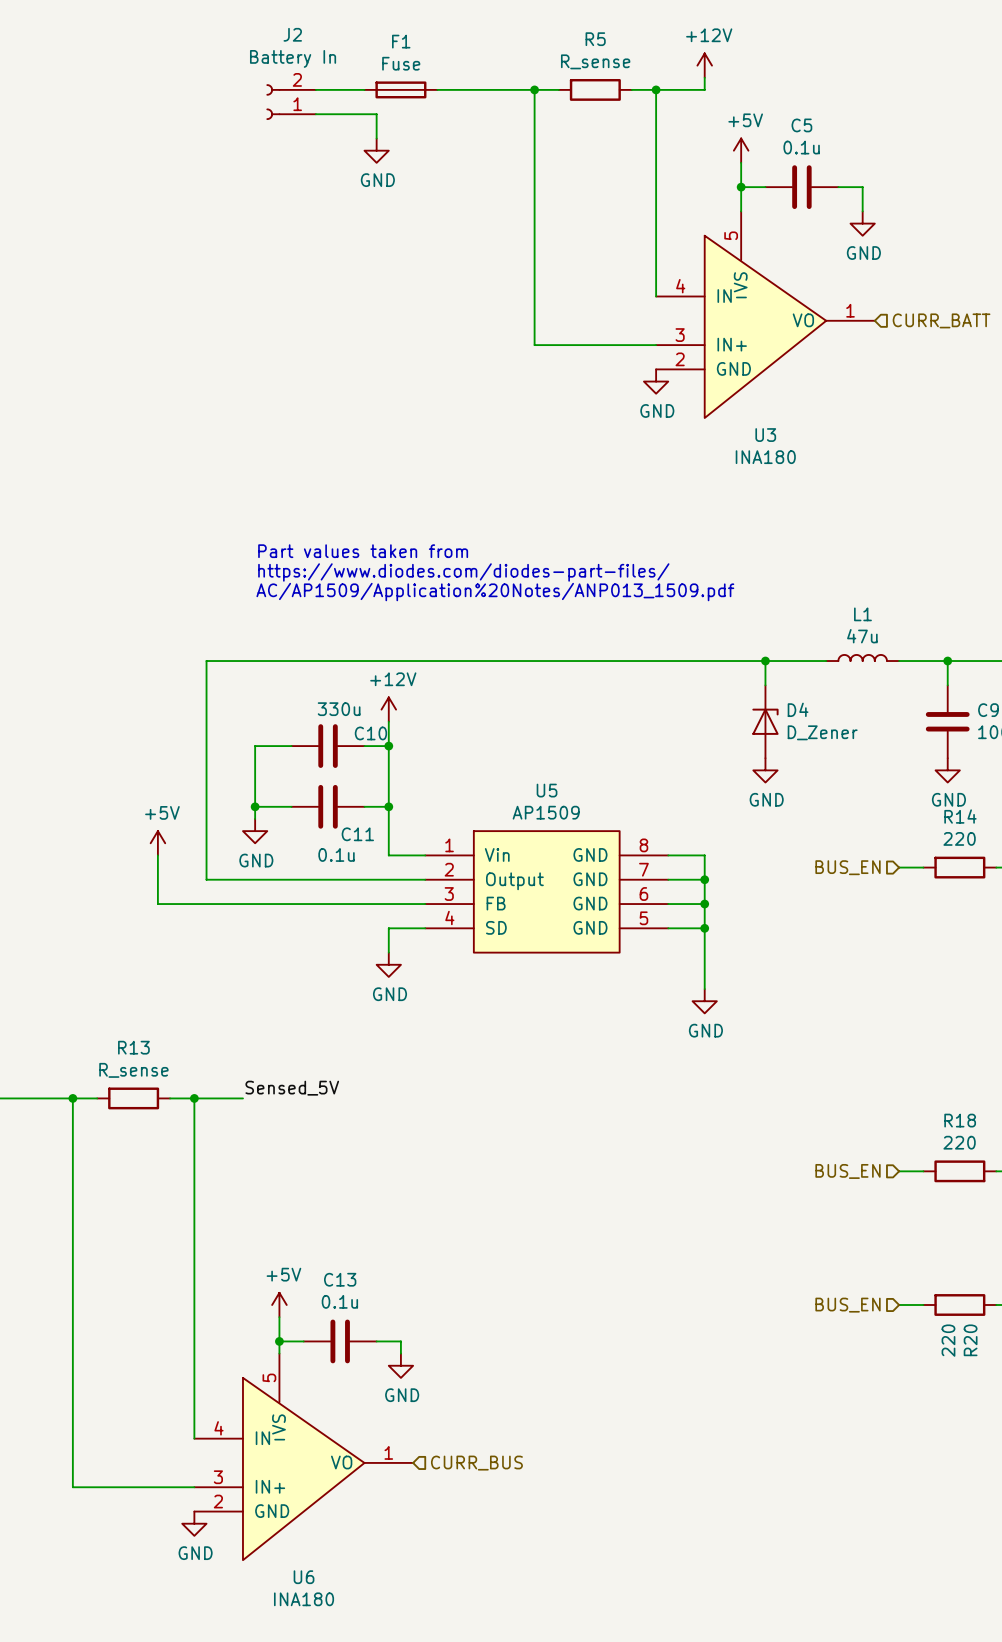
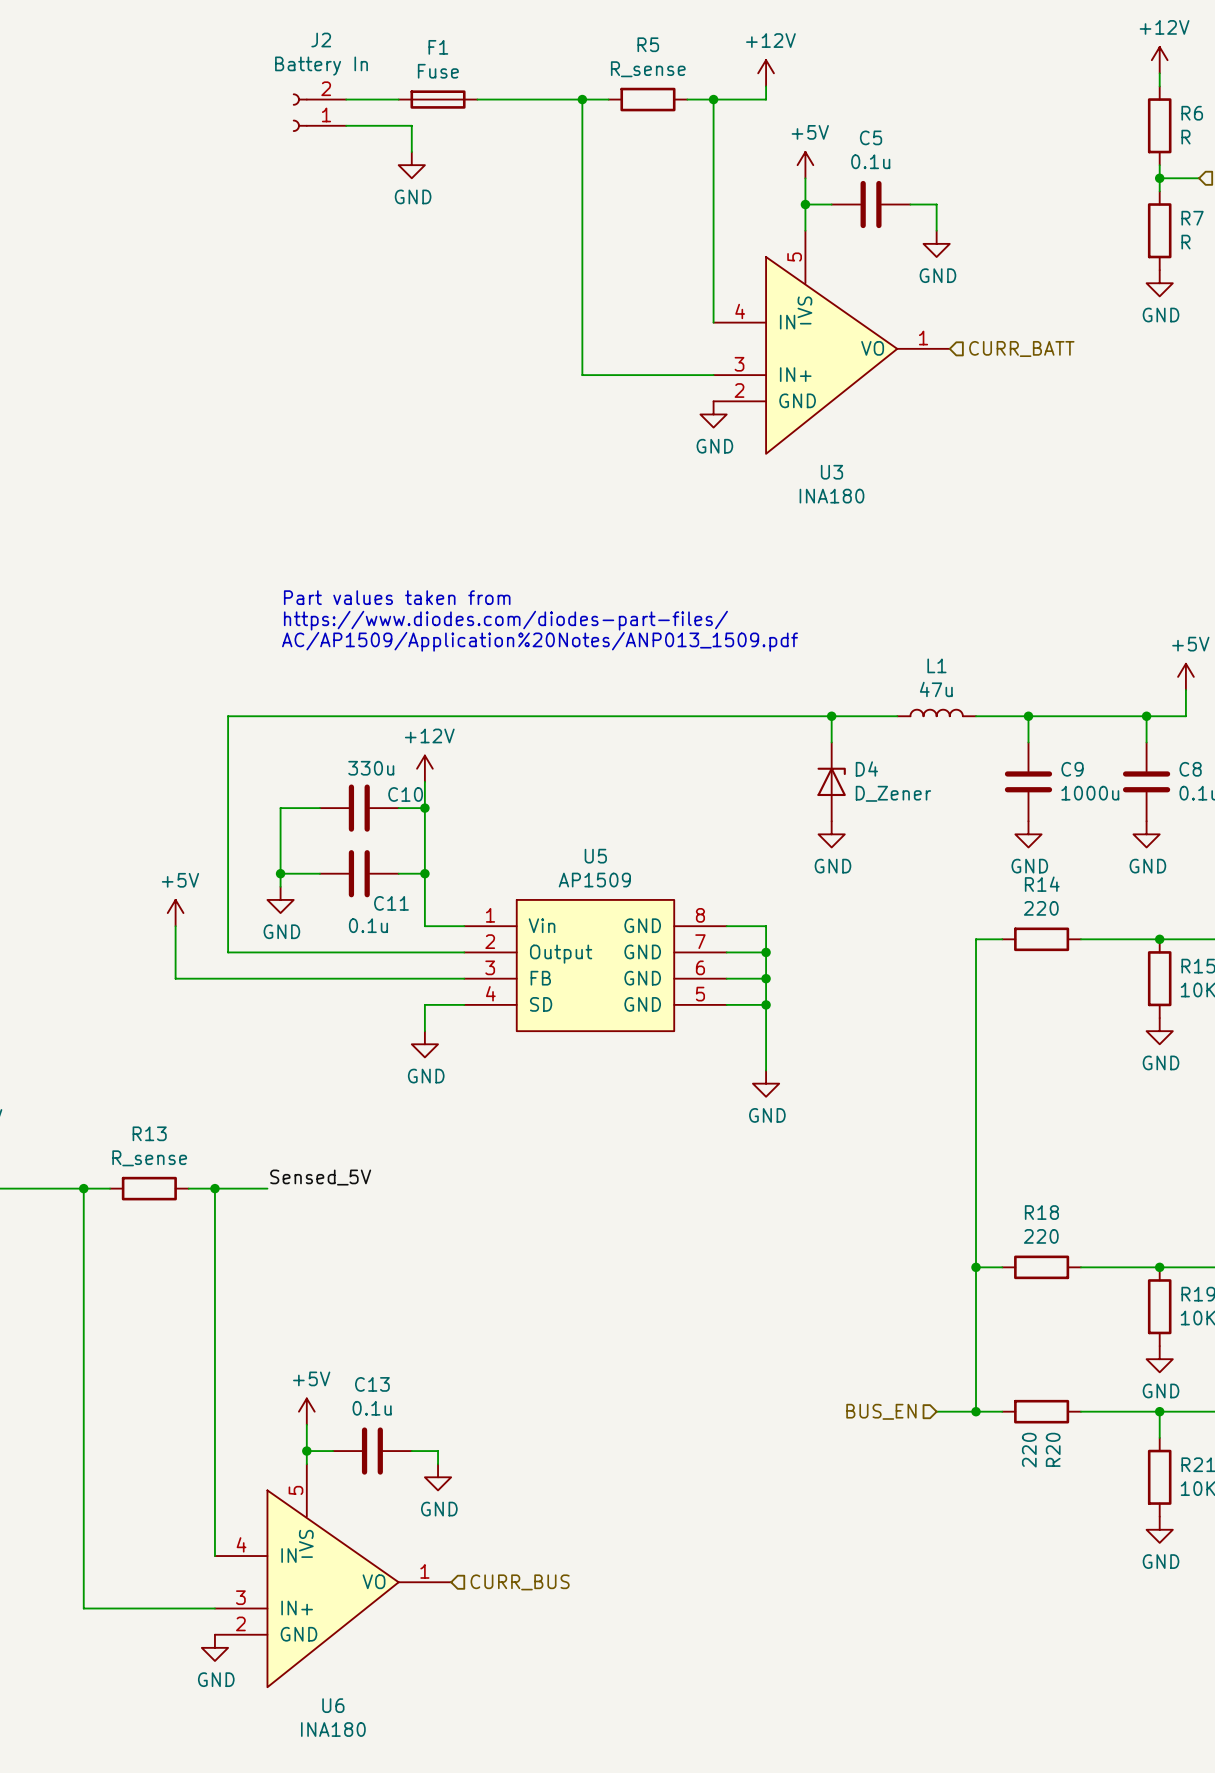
hierarchical label: BUS_EN (848, 867) -> none
wire: none -> (976, 939) (976, 1411) (936, 1411)
hierarchical label: BUS_EN (848, 1171) -> none
junction: none -> (976, 1267)
junction: none -> (976, 1411)
hierarchical label position: BUS_EN (848, 1305) -> BUS_EN (881, 1411)

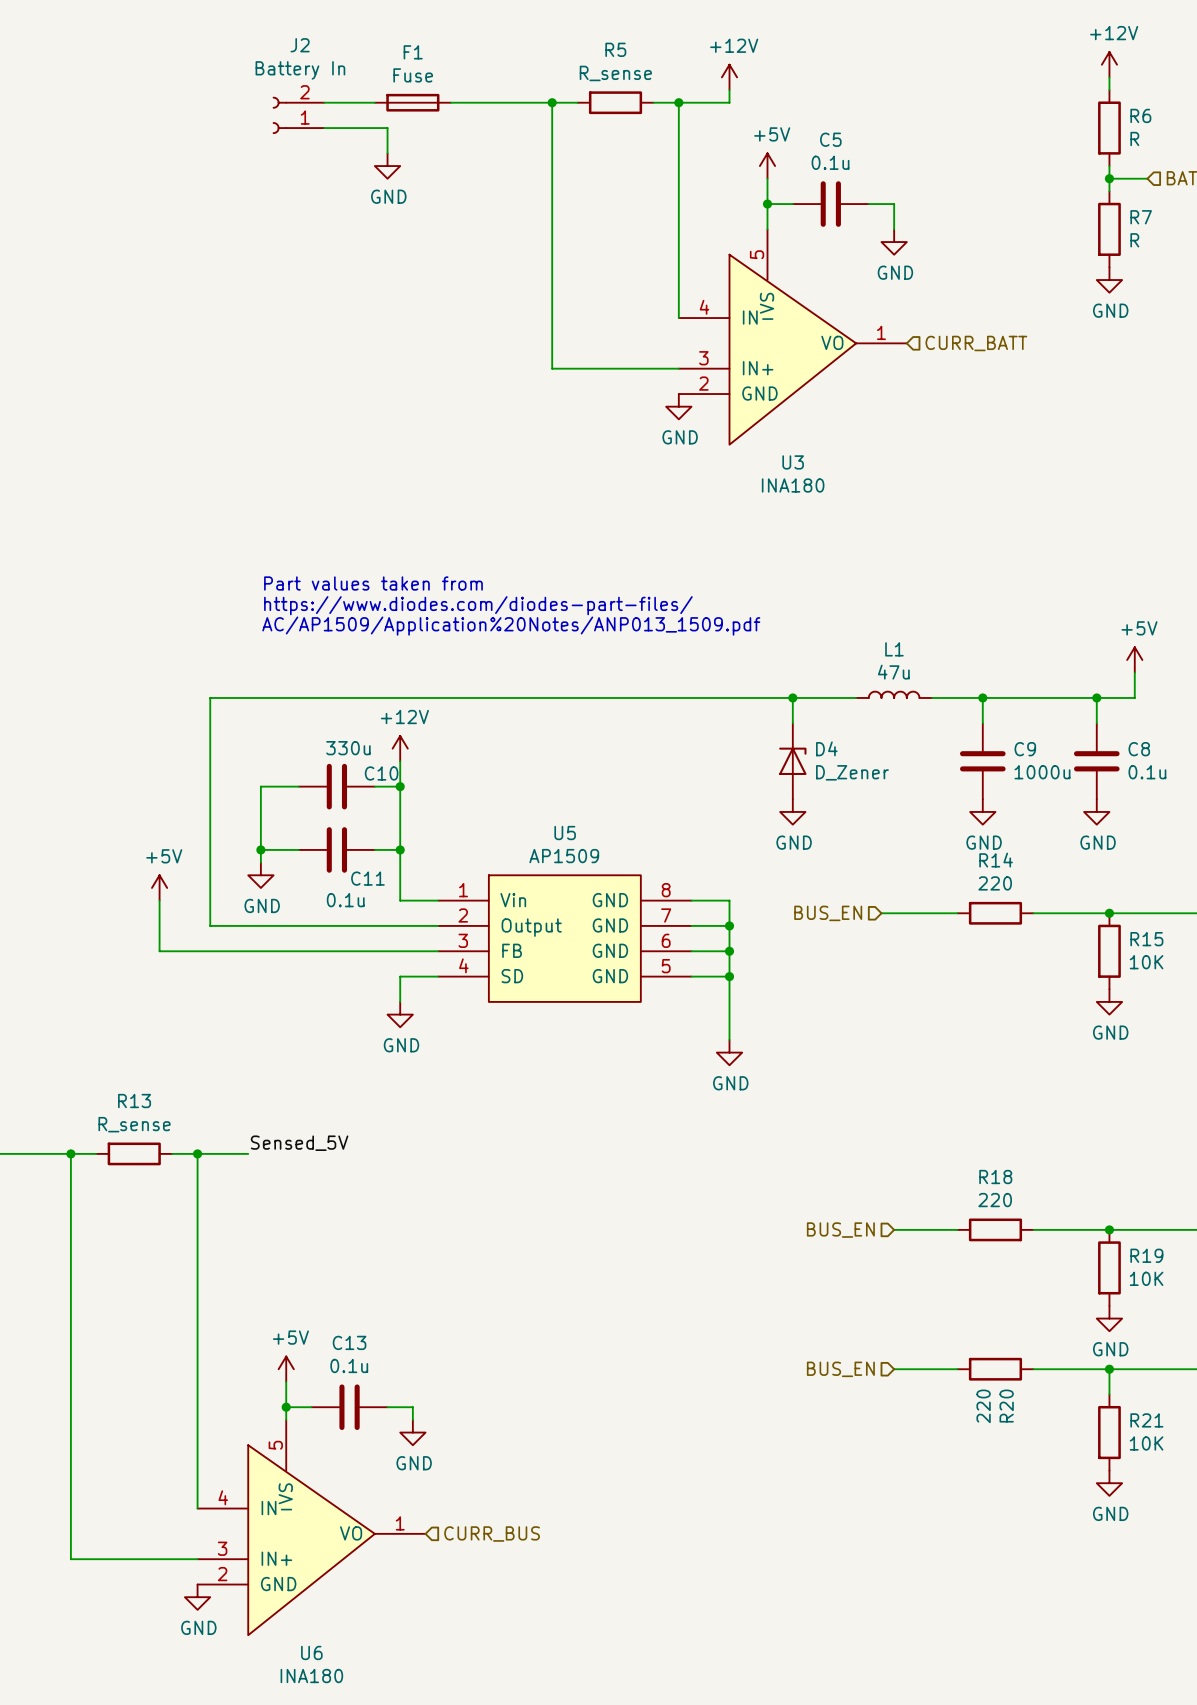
hierarchical label: none -> BUS_EN (828, 913)
wire: (976, 939) (976, 1411) -> (932, 913) (881, 913)
hierarchical label: none -> BUS_EN (840, 1230)
wire: none -> (894, 1229) (932, 1229)
junction: (976, 1267) -> none
junction: (976, 1411) -> none

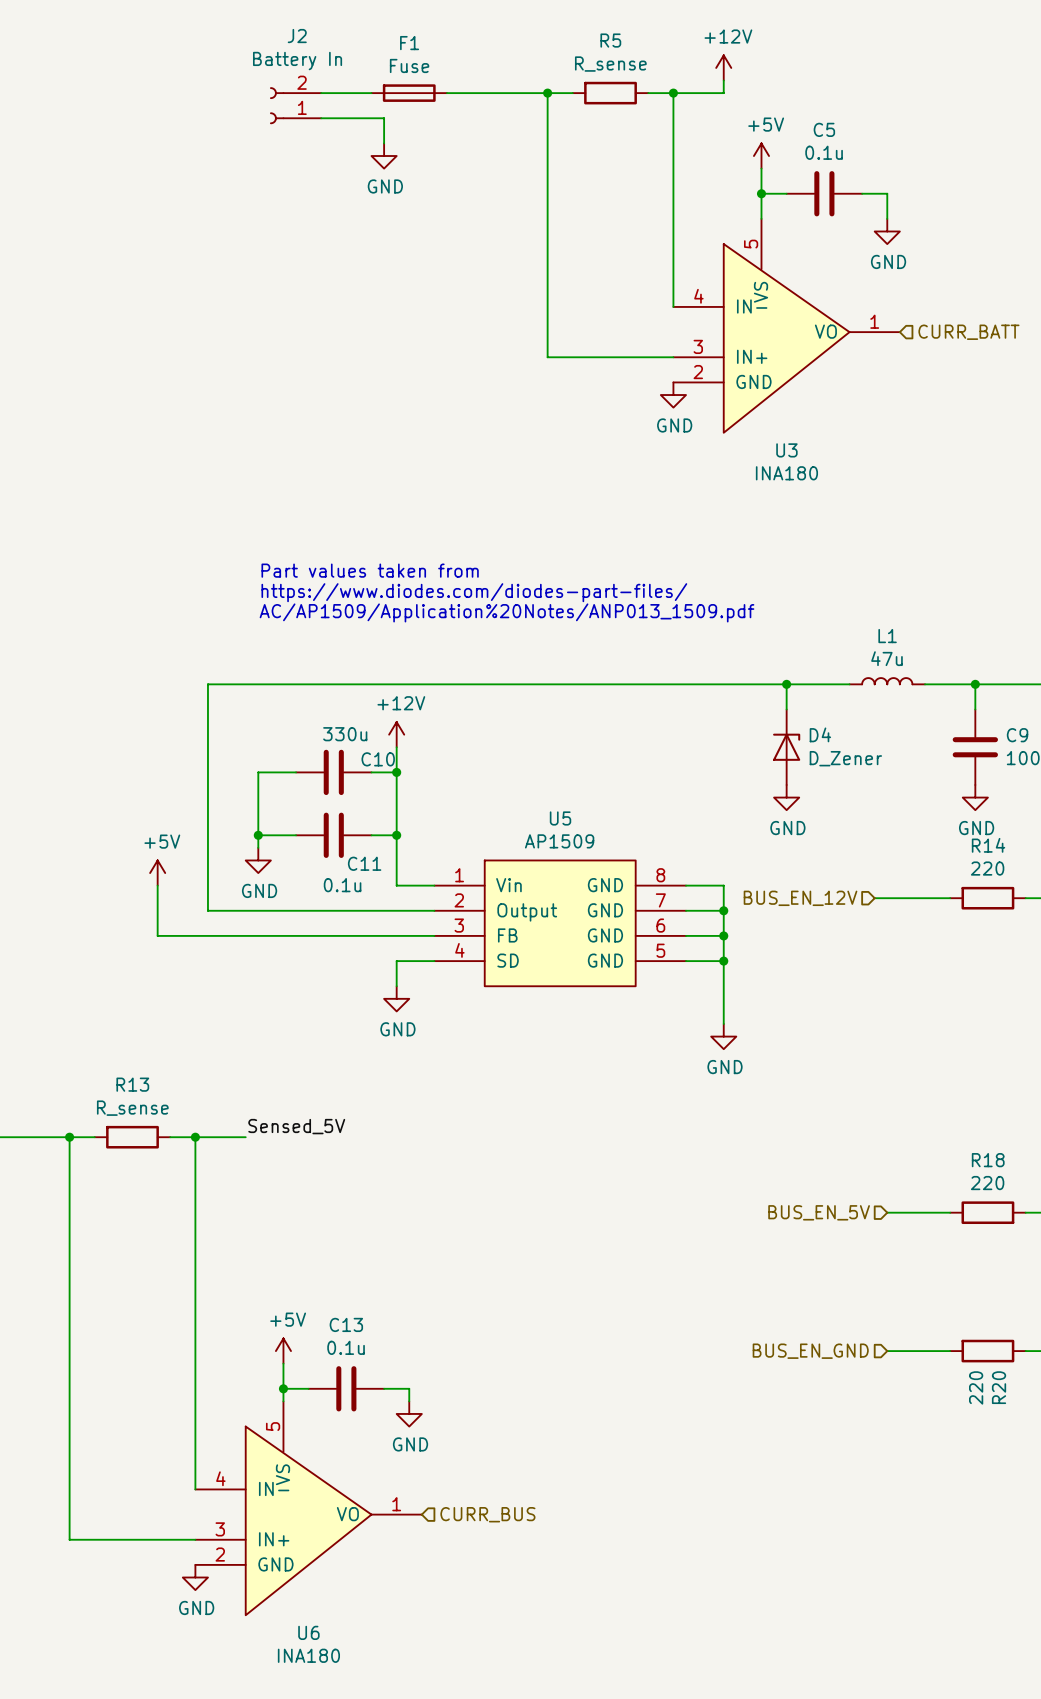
hierarchical label: BUS_EN (828, 913) -> BUS_EN_12V (800, 898)
hierarchical label: BUS_EN (840, 1230) -> BUS_EN_5V (819, 1212)
hierarchical label: BUS_EN (840, 1369) -> BUS_EN_GND (810, 1351)

